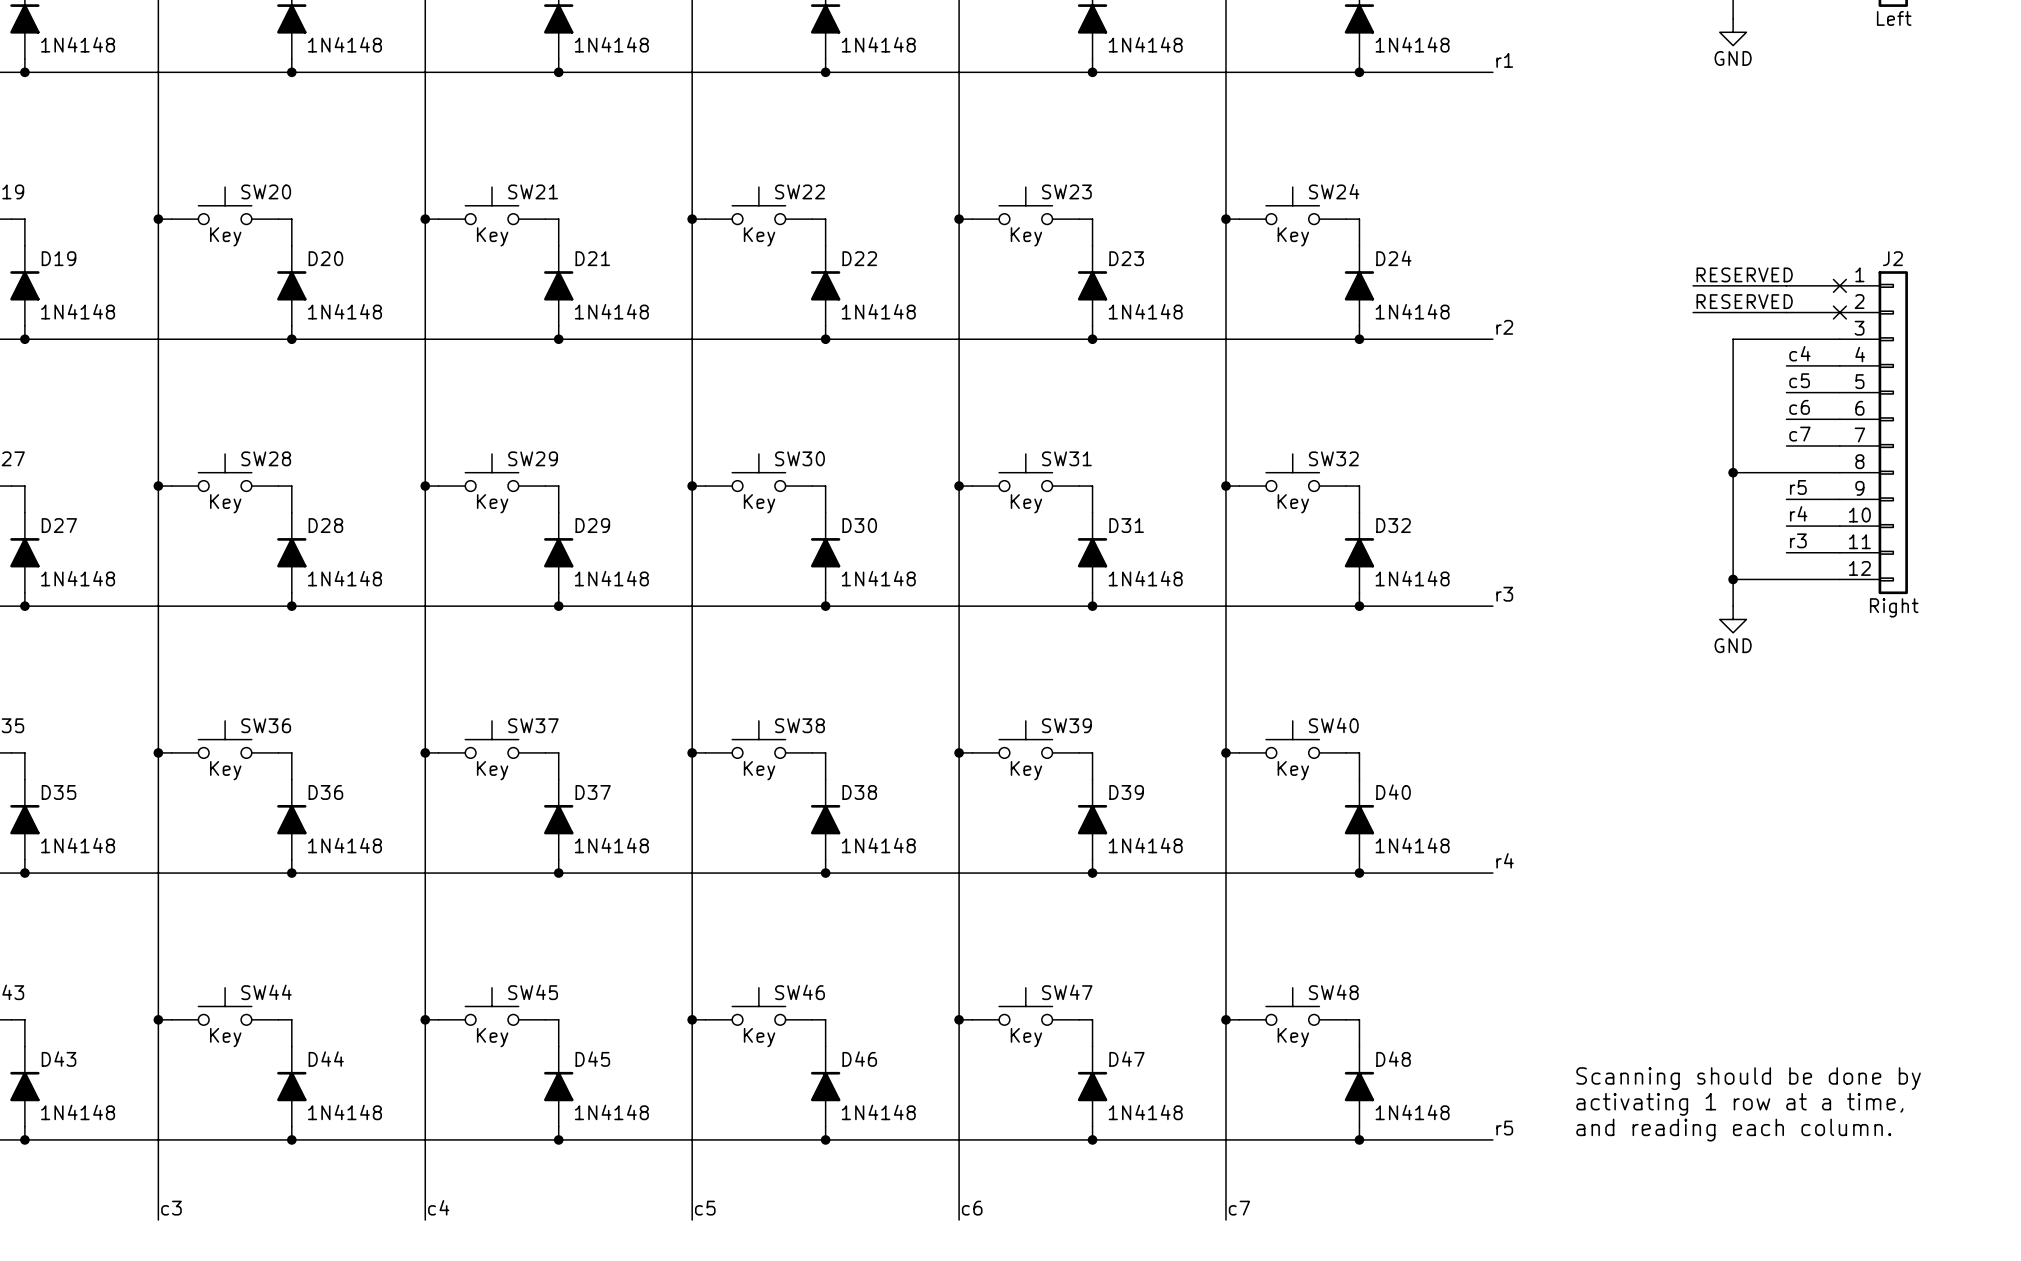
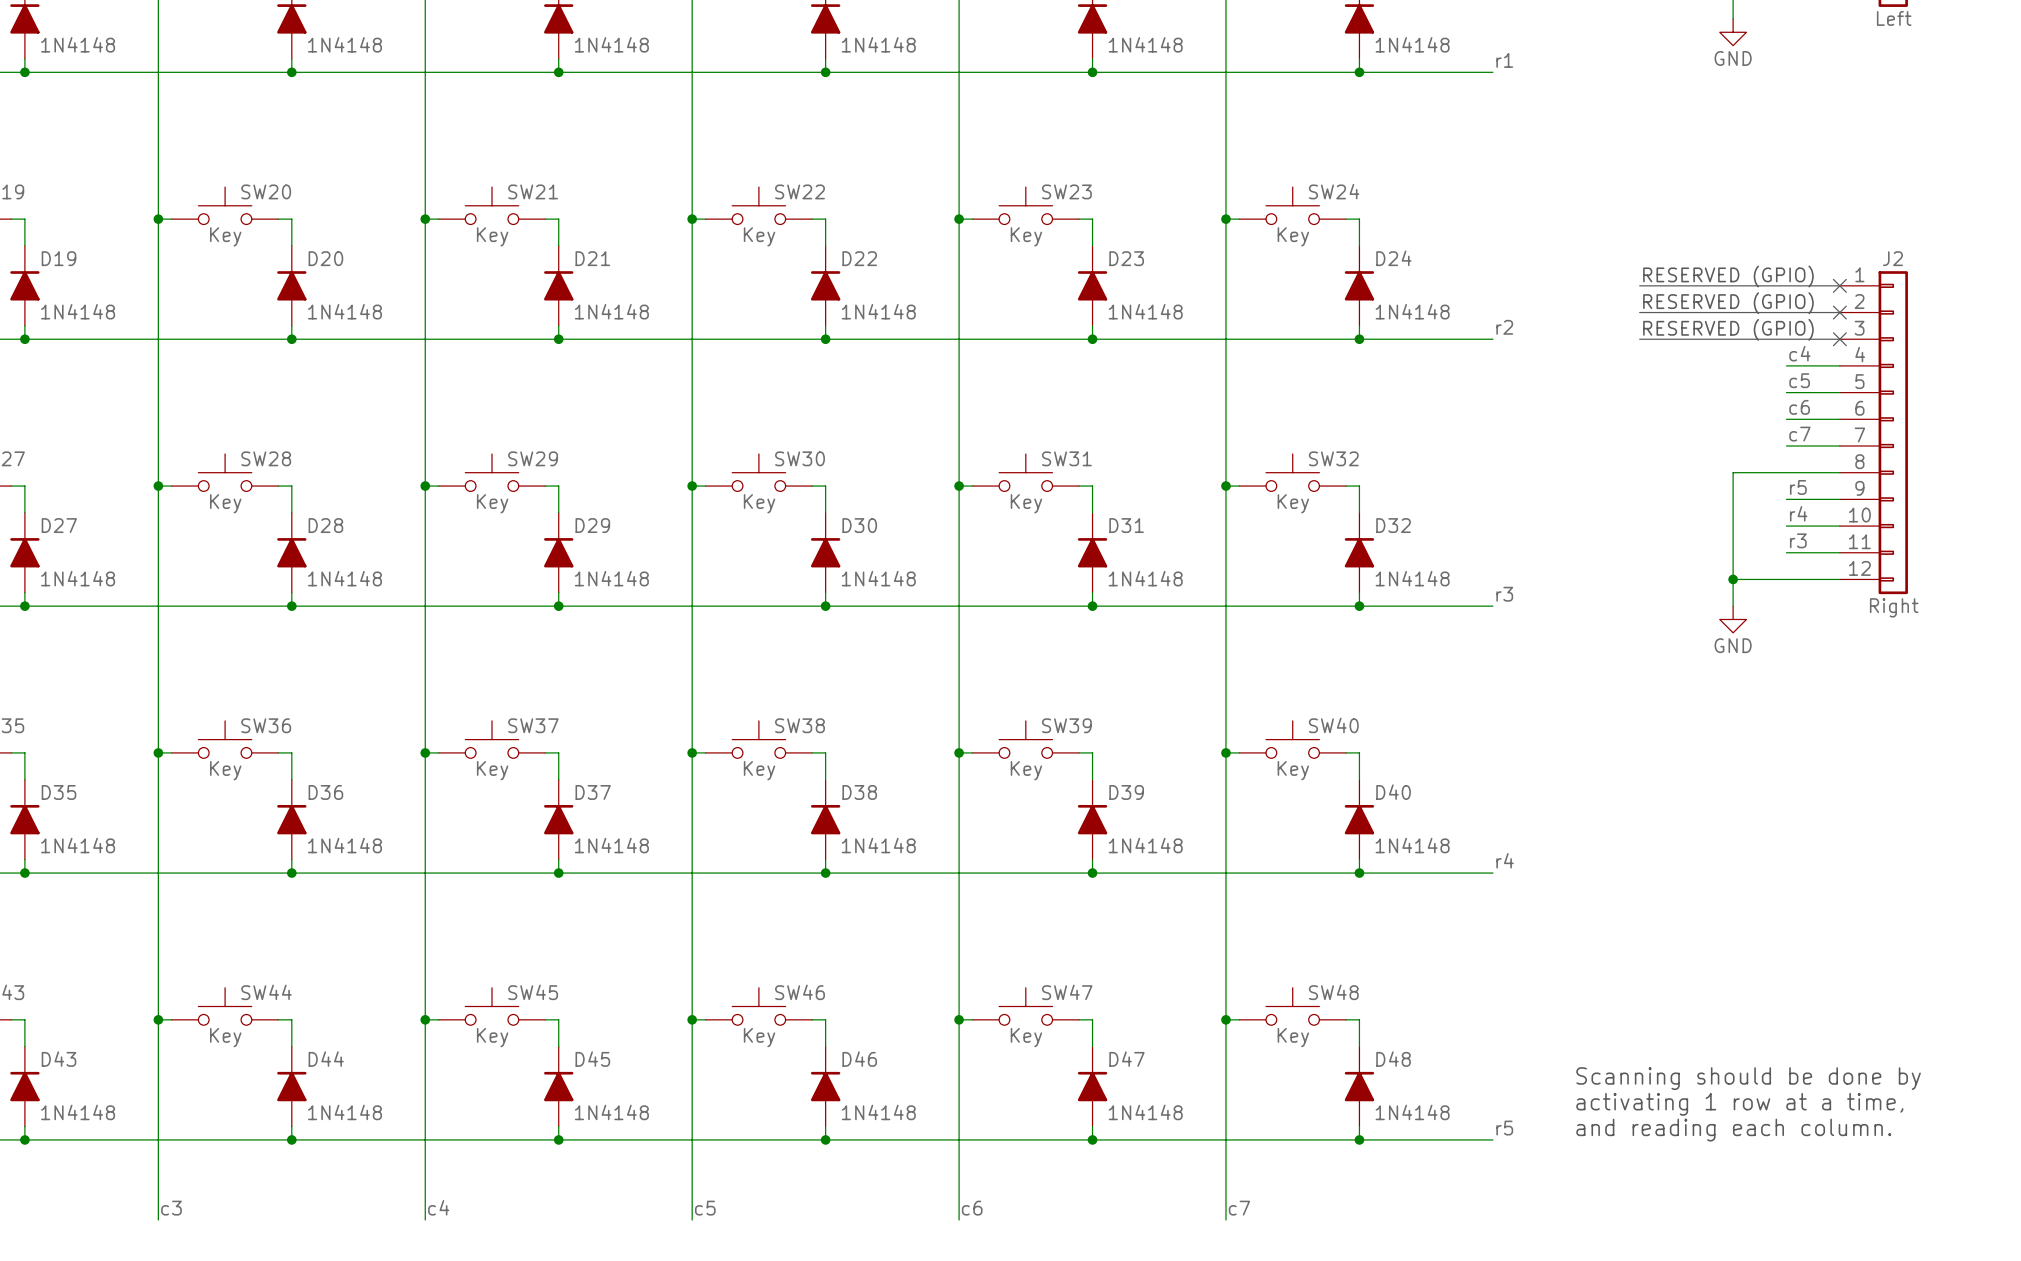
text: RESERVED (1744, 274) -> none
text: none -> RESERVED (GPIO) (1728, 276)
line: none -> (1639, 285) (1693, 285)
text: RESERVED (1744, 301) -> none
text: none -> RESERVED (GPIO) (1728, 303)
line: none -> (1639, 312) (1693, 312)
text: none -> RESERVED (GPIO) (1728, 329)
line: none -> (1639, 339) (1839, 339)
wire: (1839, 339) (1733, 339) (1733, 472) -> none
no-connect mark: none -> (1839, 339)
junction: (1733, 472) -> none

